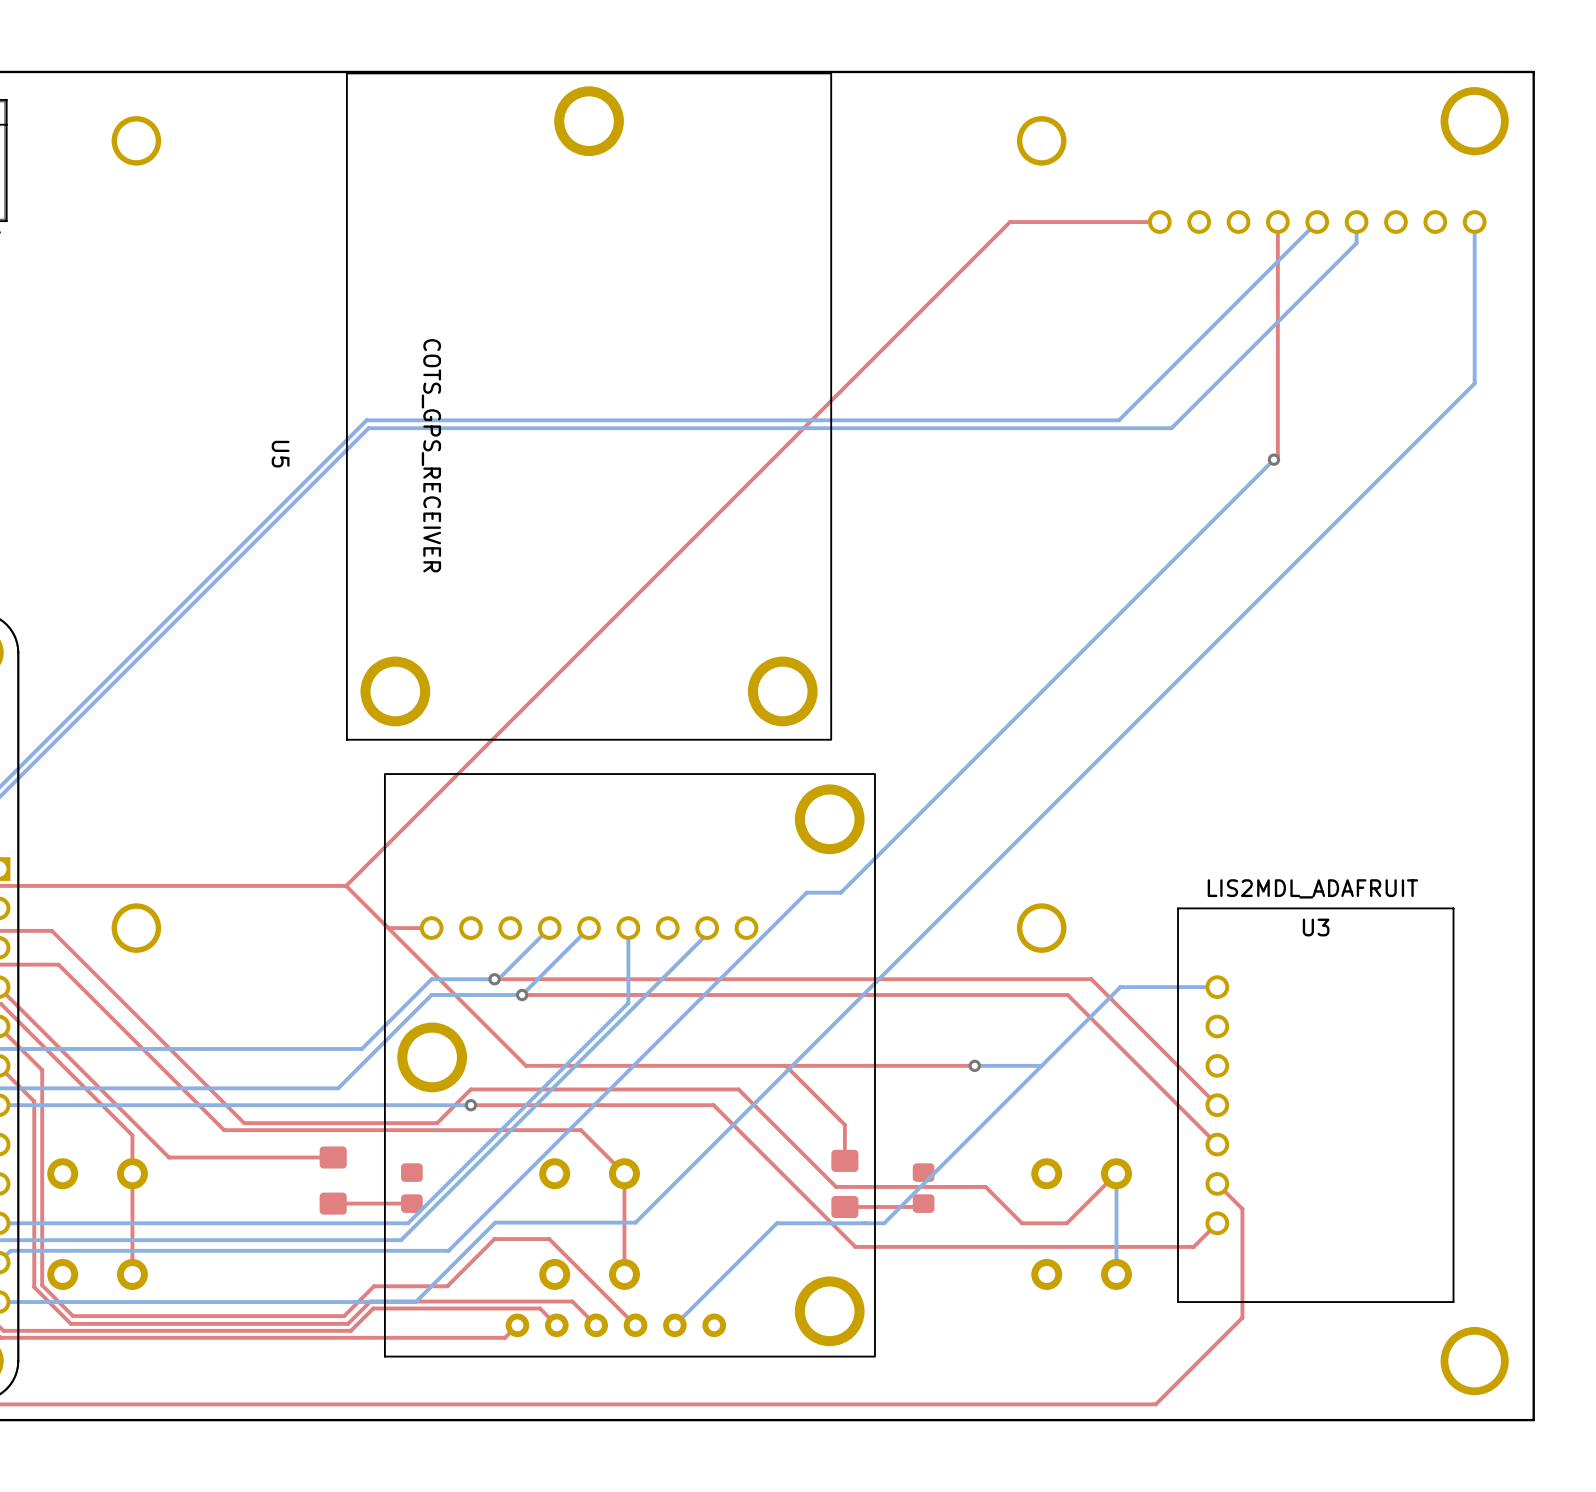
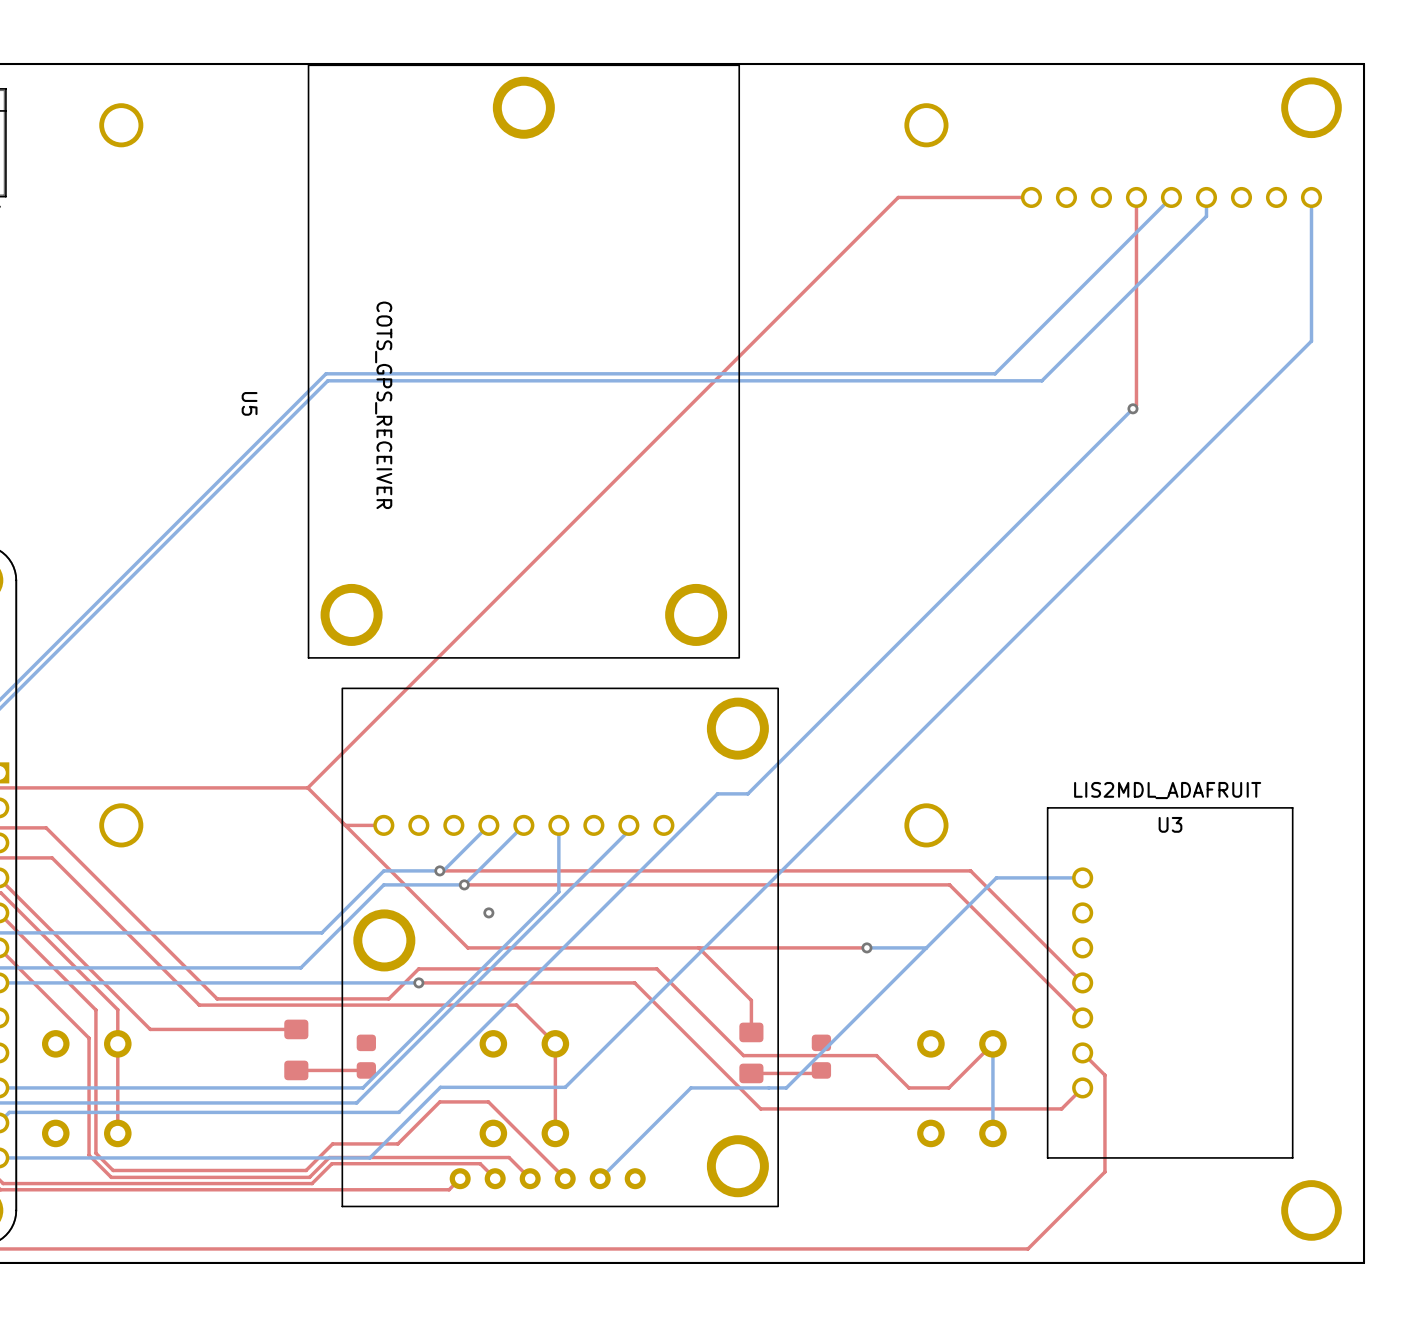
via: none -> (488, 912)
top track: (42, 1070) (42, 1285) (73, 1316) (127, 1316) -> (37, 951) (95, 1010) (95, 1153) (113, 1170)
top track: (34, 1101) (34, 1287) (70, 1323) (125, 1323) -> (30, 979) (89, 1038) (89, 1155) (111, 1177)

